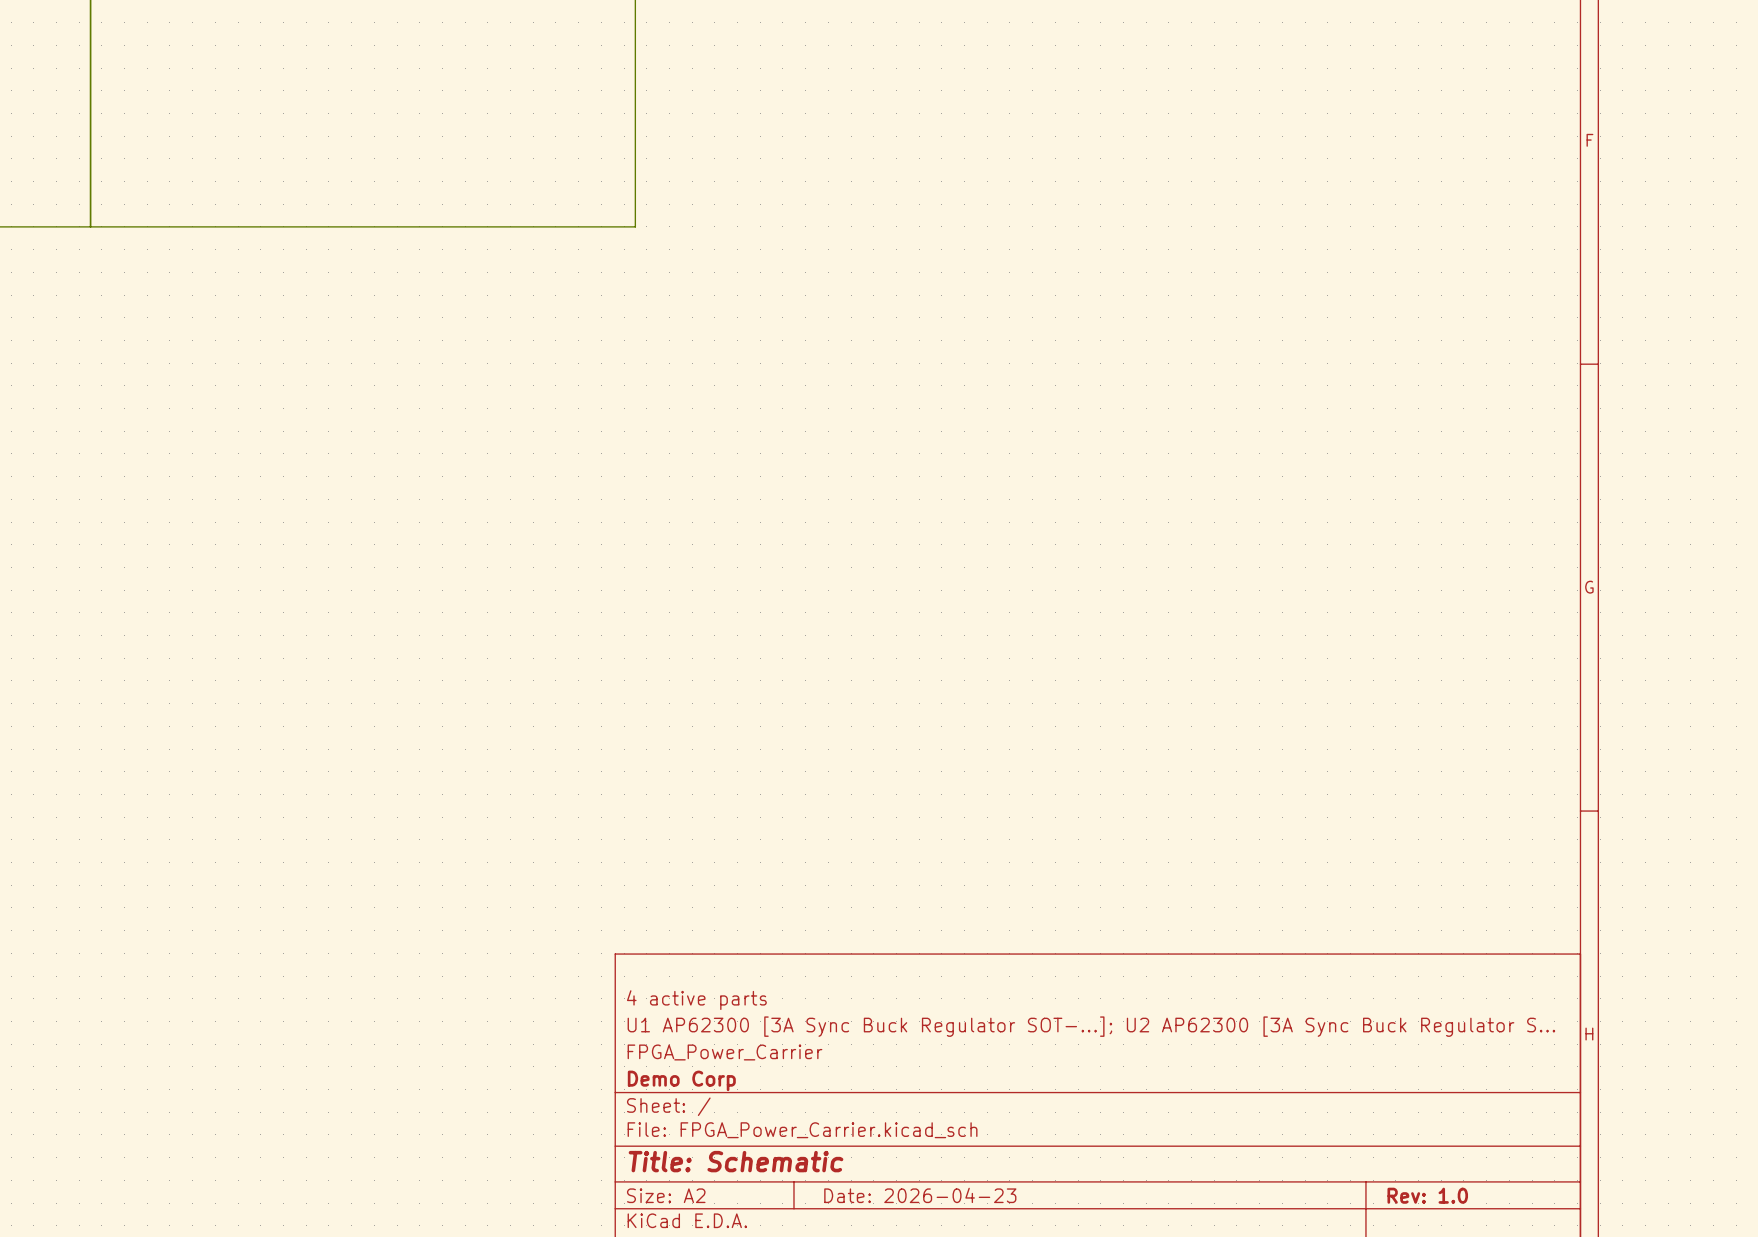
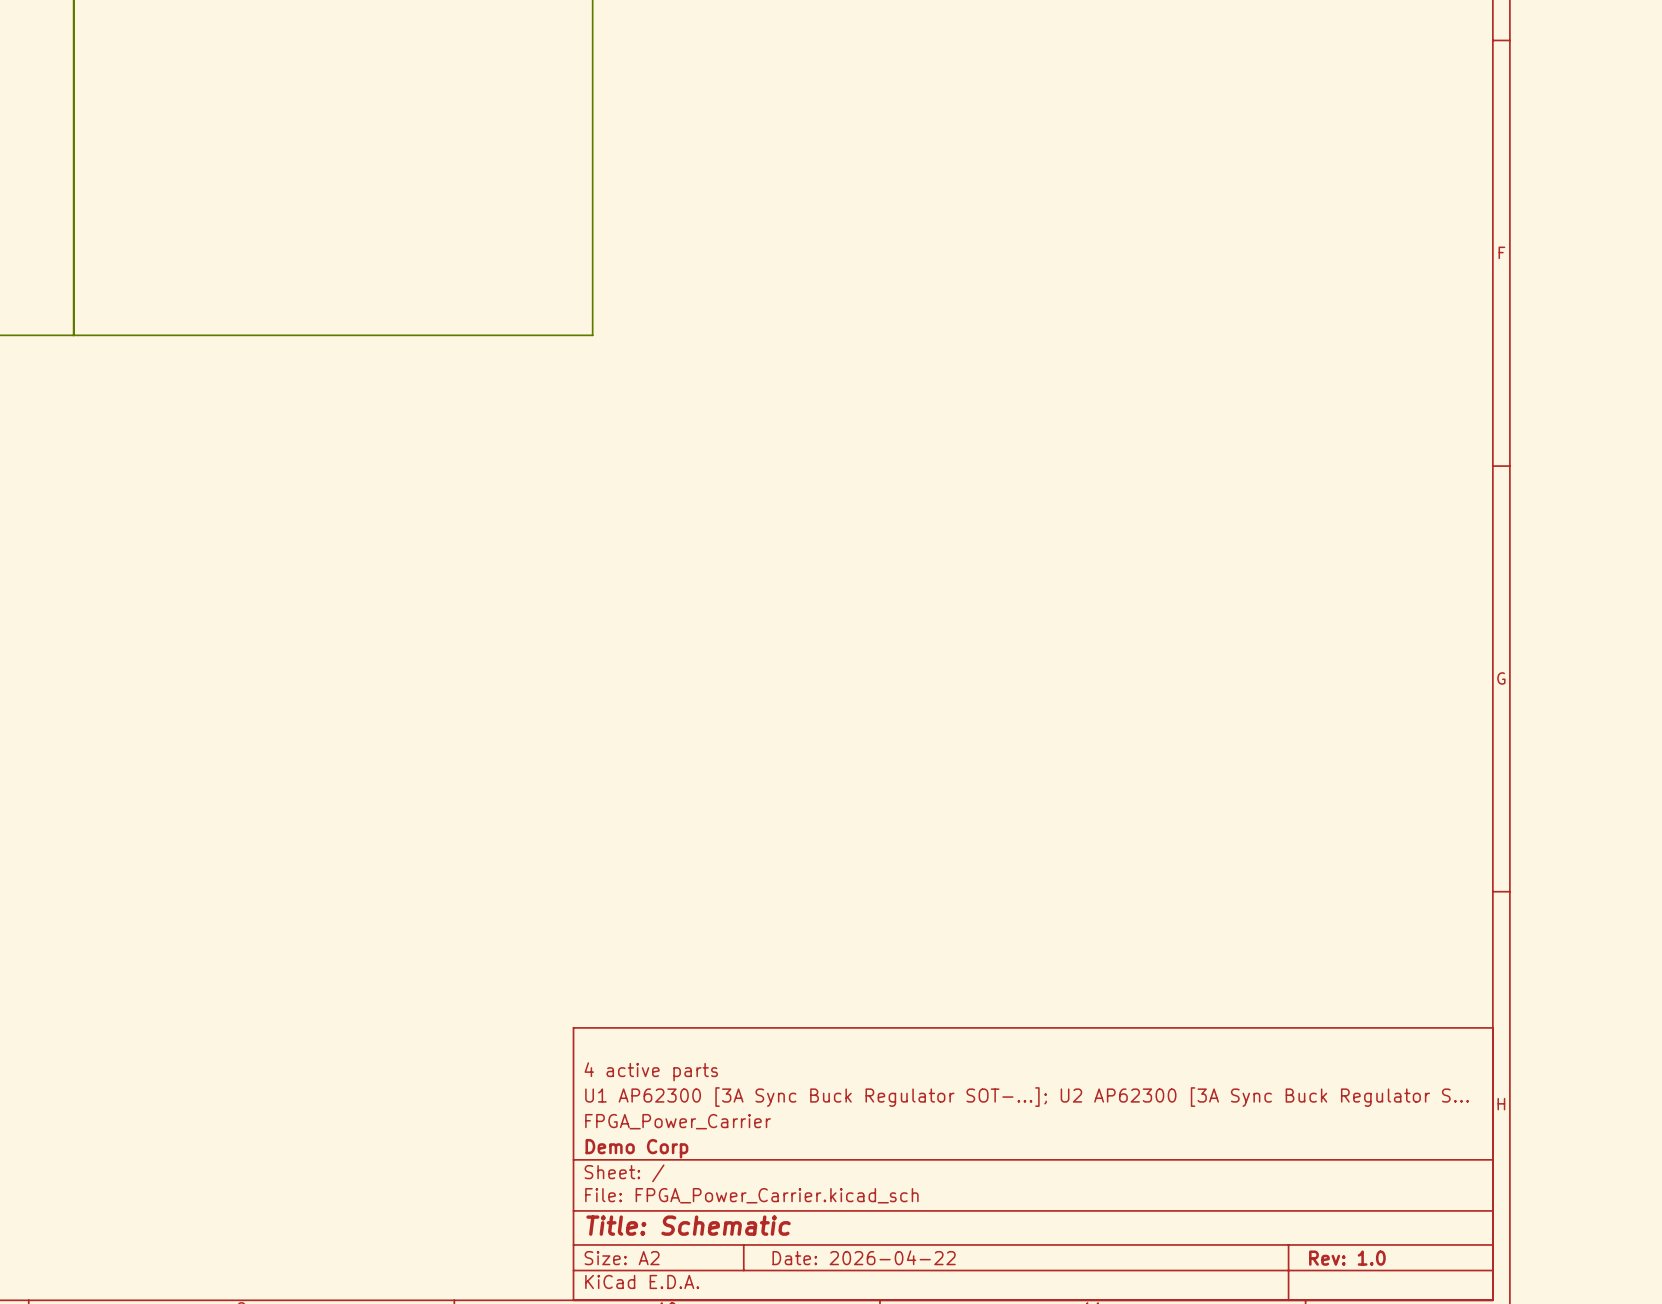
title block: Date: 2026-04-23 (920, 1195) -> Date: 2026-04-22 (864, 1257)

